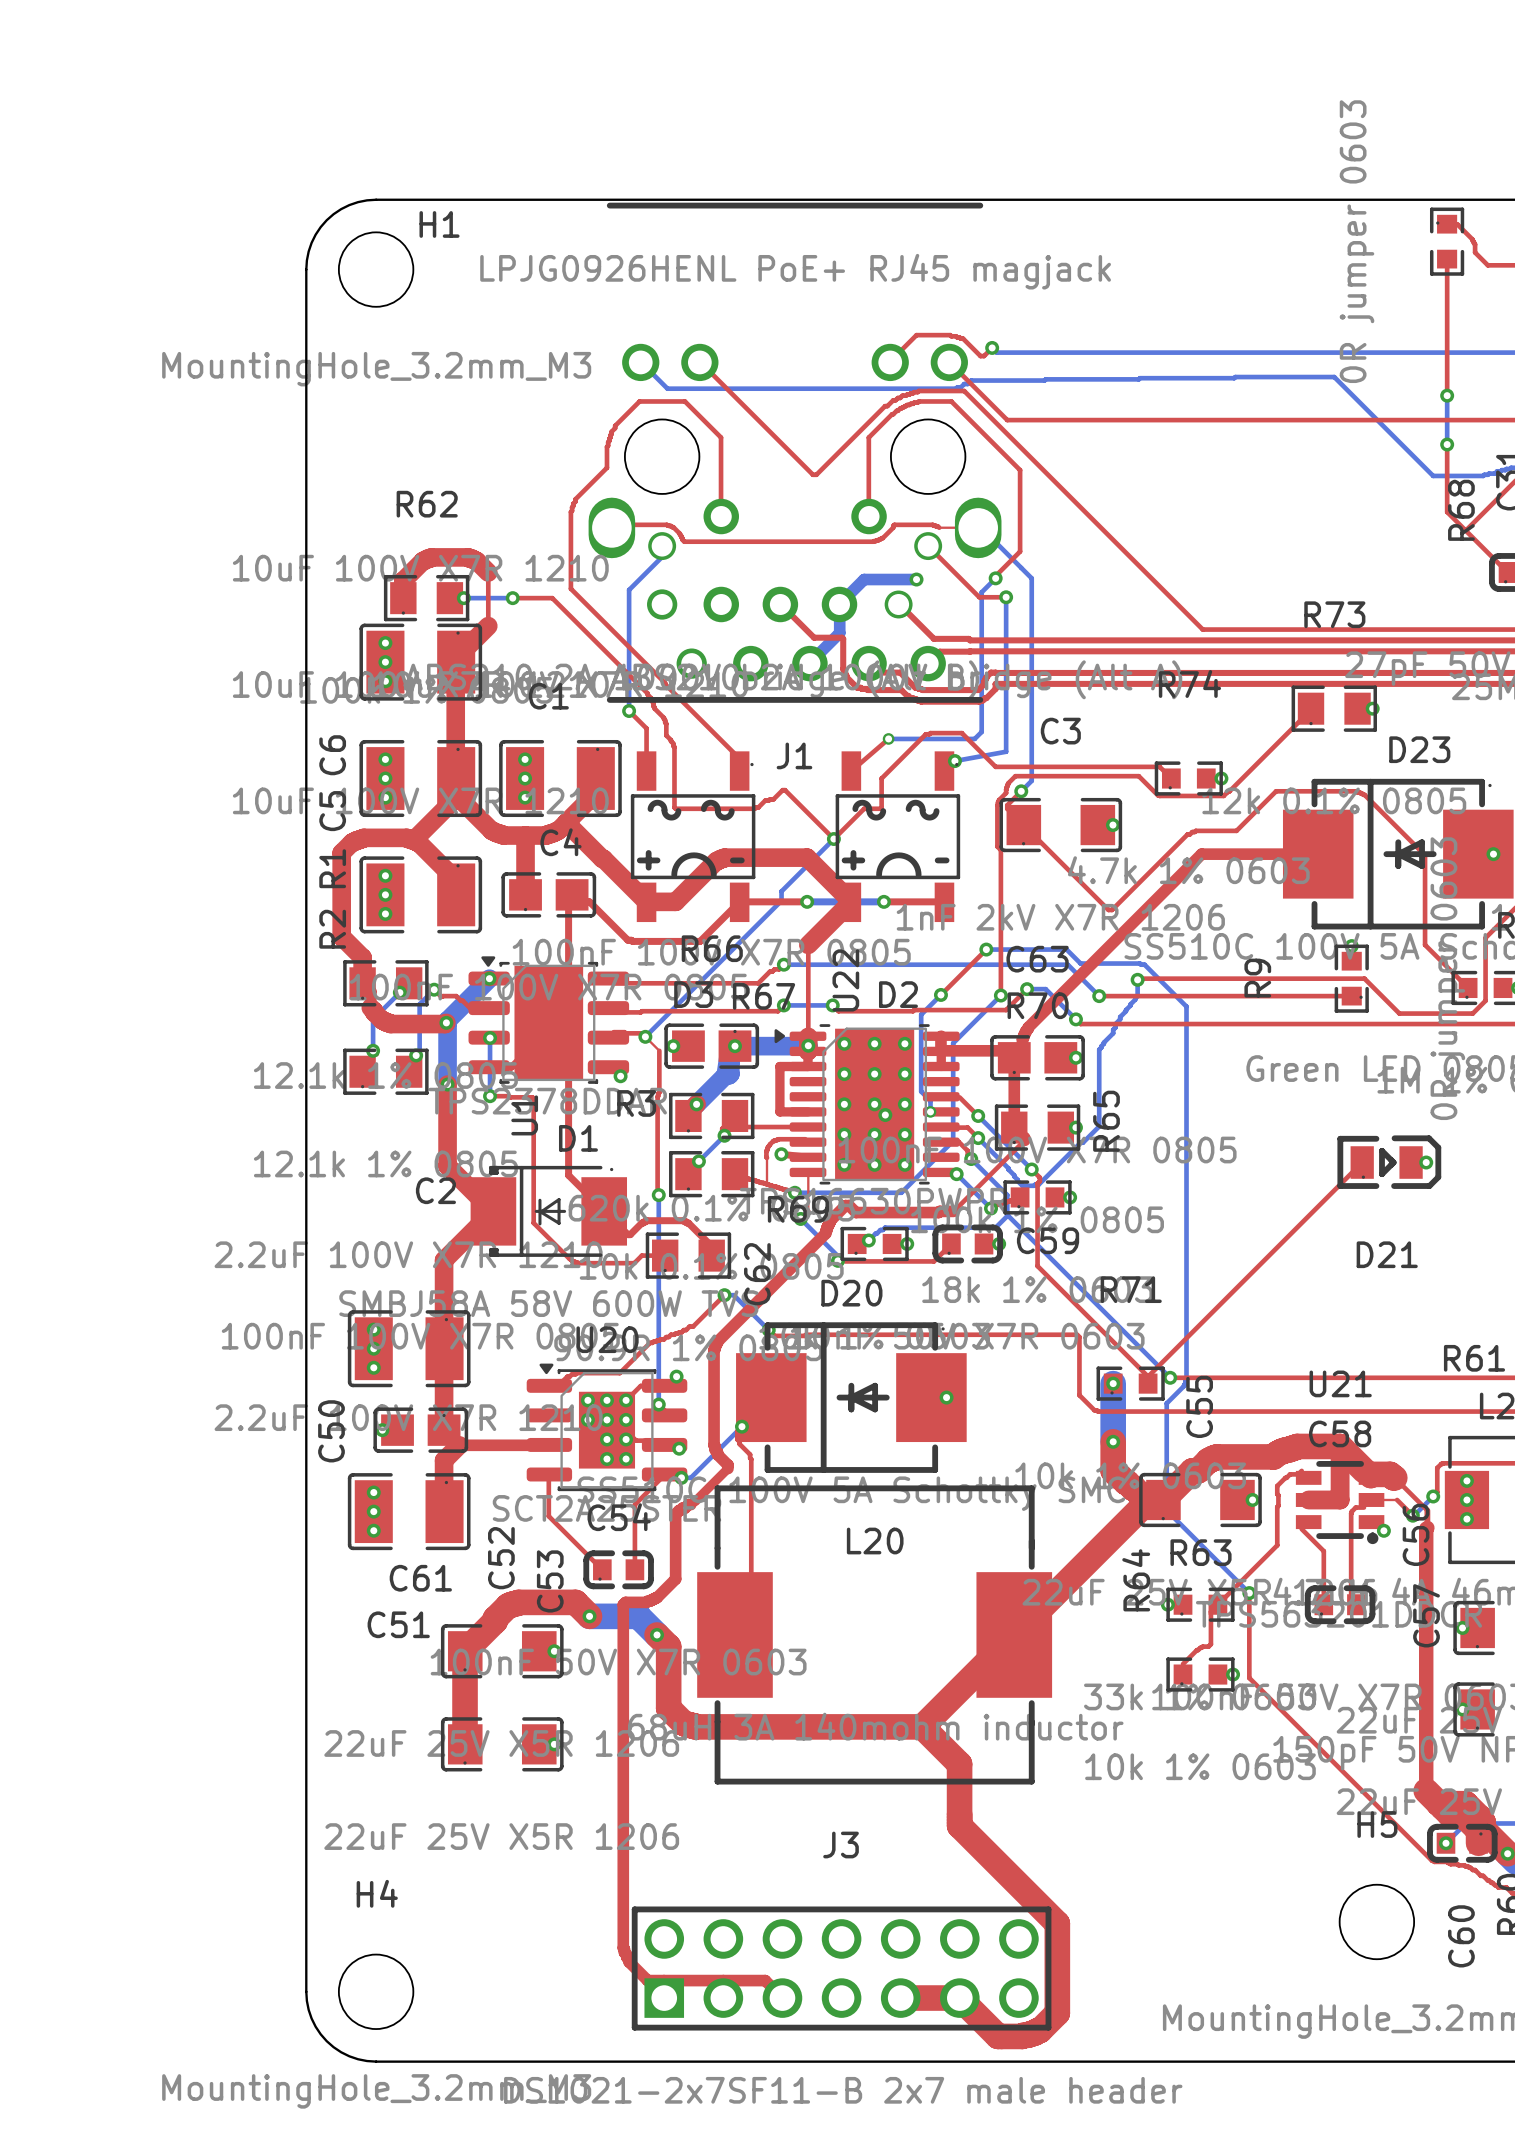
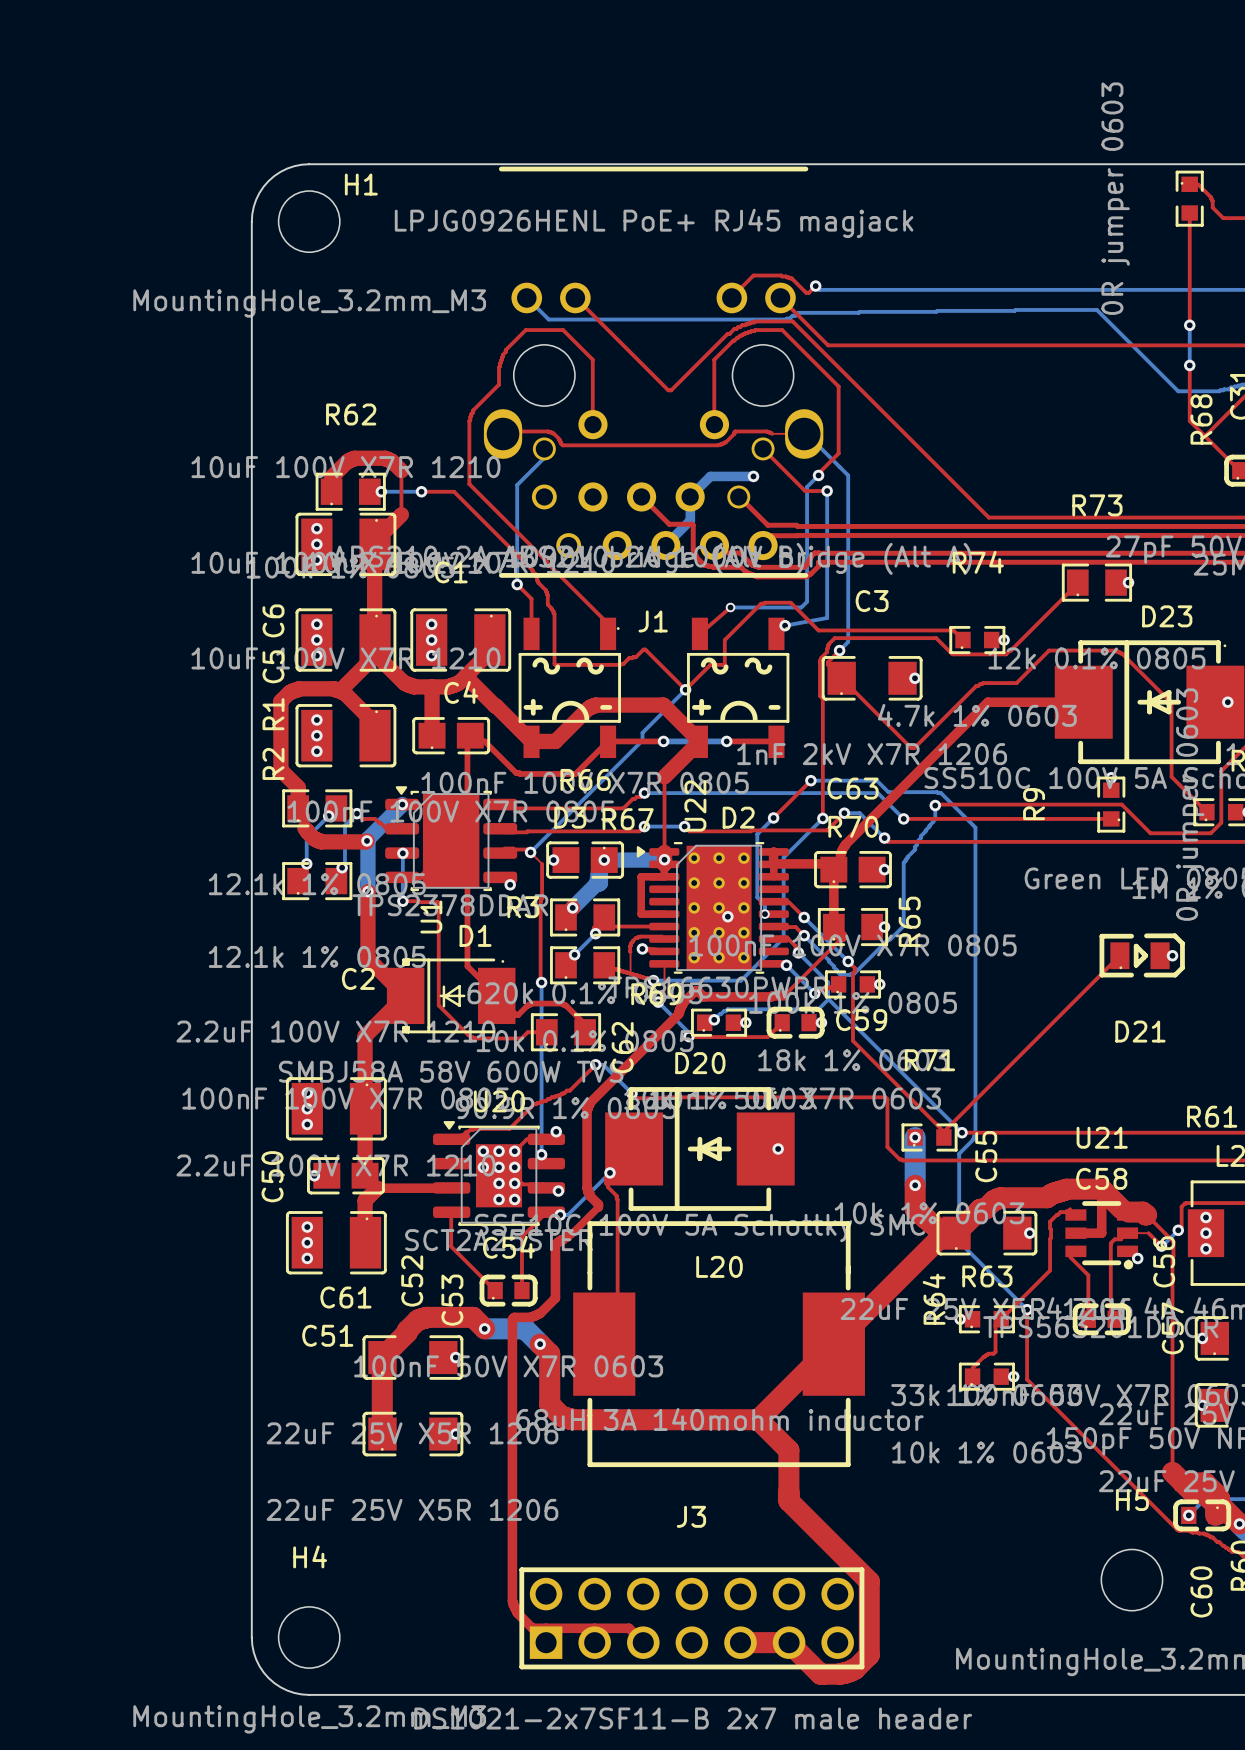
top track width: thick (1340, 1446) (1340, 1499) (1308, 1499) -> thin (1101, 1189) (1101, 1233) (1075, 1233)
top track width: thick (1427, 1510) (1426, 1790) -> thin (1173, 1241) (1172, 1472)

